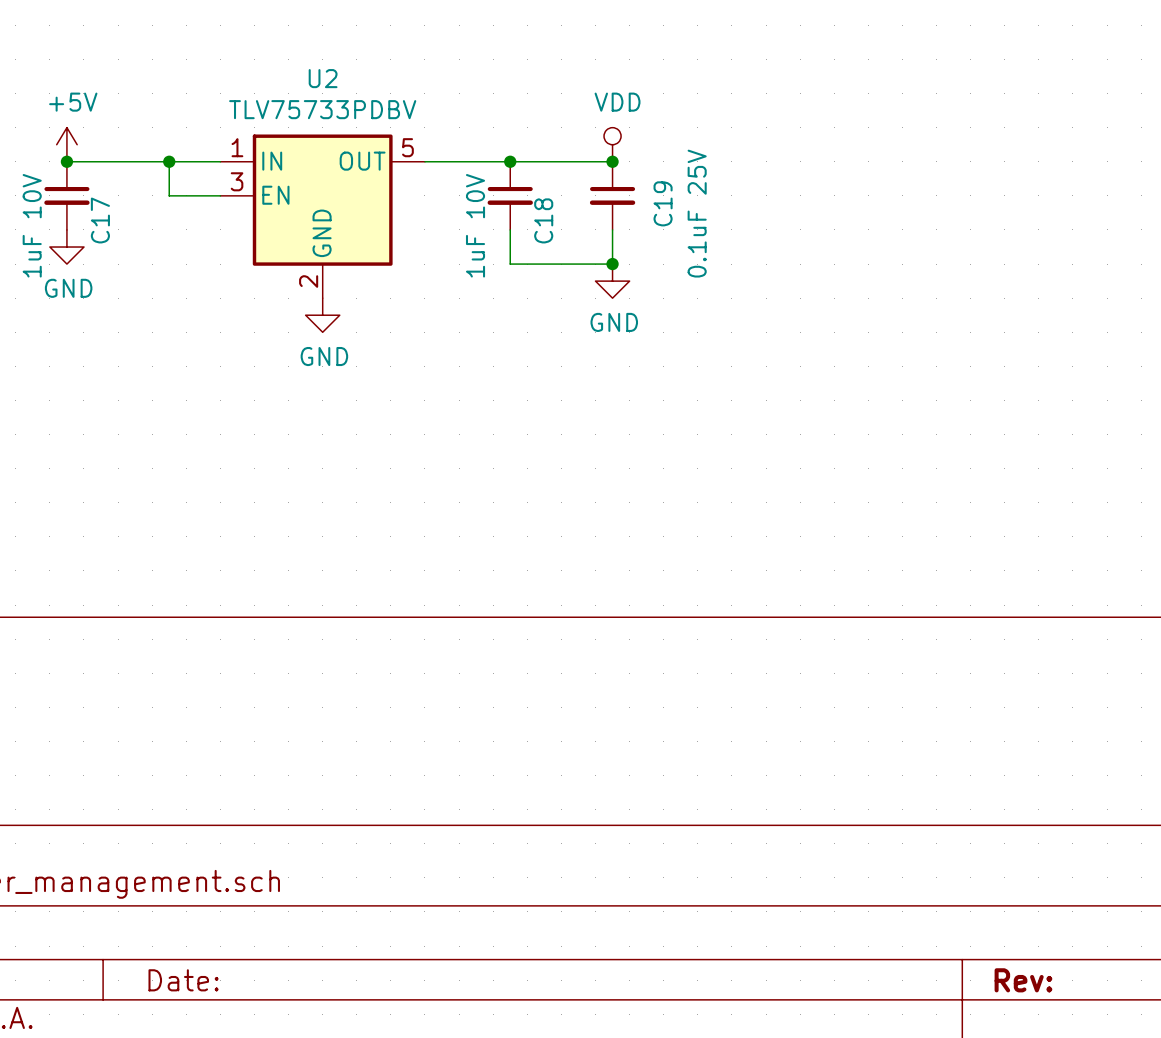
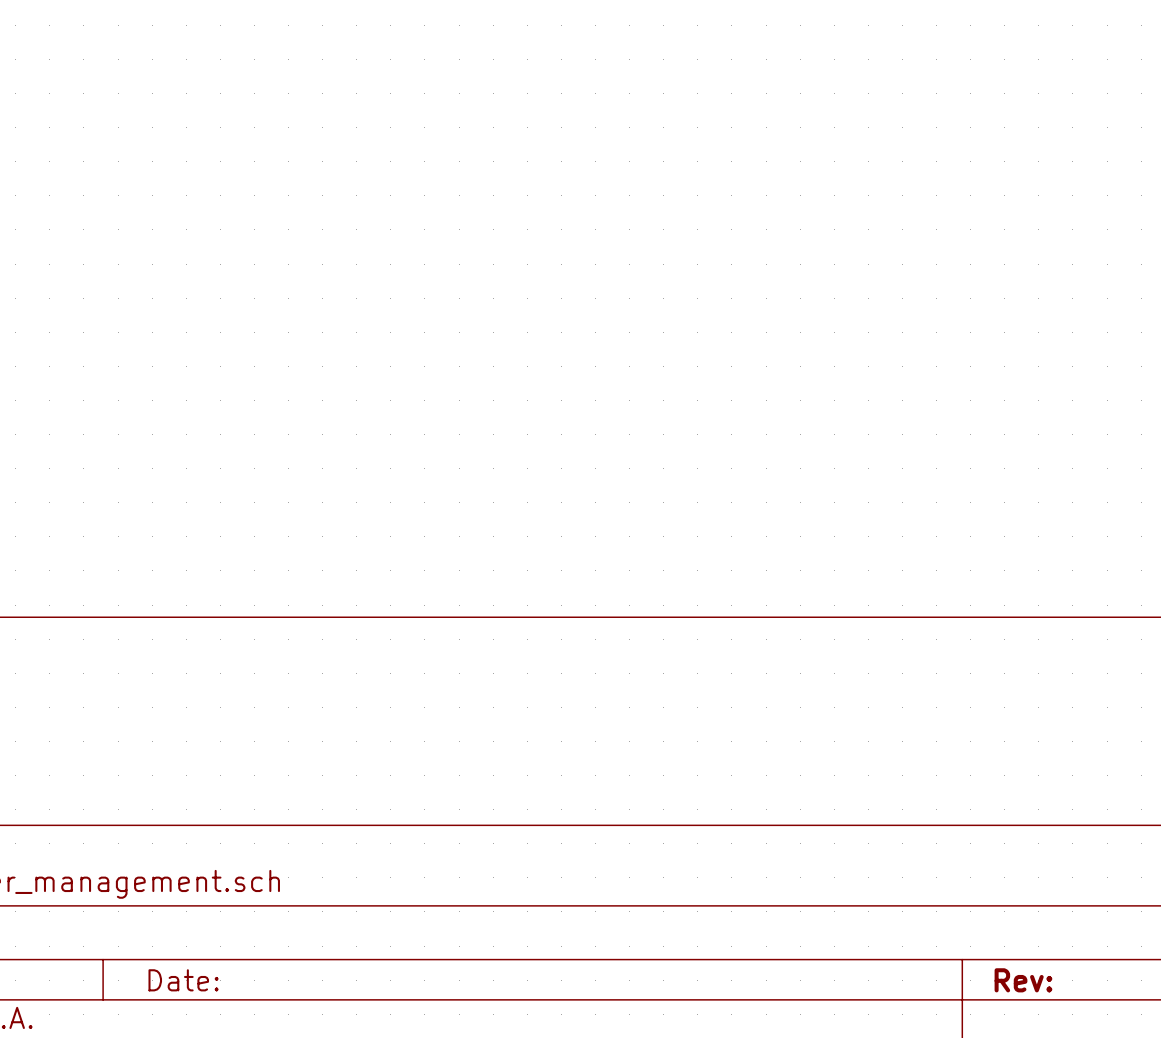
power symbol: +5V (66, 144) -> none
power symbol: VDD (612, 144) -> none
wire: (66, 161) (220, 161) -> none
junction: (66, 161) -> none
wire: (169, 161) (169, 195) (220, 195) -> none
junction: (169, 161) -> none
wire: (424, 161) (612, 161) -> none
junction: (510, 161) -> none
junction: (612, 161) -> none
C17: 1uF 10V (66, 195) -> none
C18: 1uF 10V (510, 195) -> none
C19: 0.1uF 25V (612, 195) -> none
U2: TLV75733PDBV (322, 216) -> none
wire: (510, 229) (510, 264) (612, 264) (612, 229) -> none
power symbol: GND (66, 247) -> none
junction: (612, 264) -> none
power symbol: GND (612, 281) -> none
power symbol: GND (322, 315) -> none

